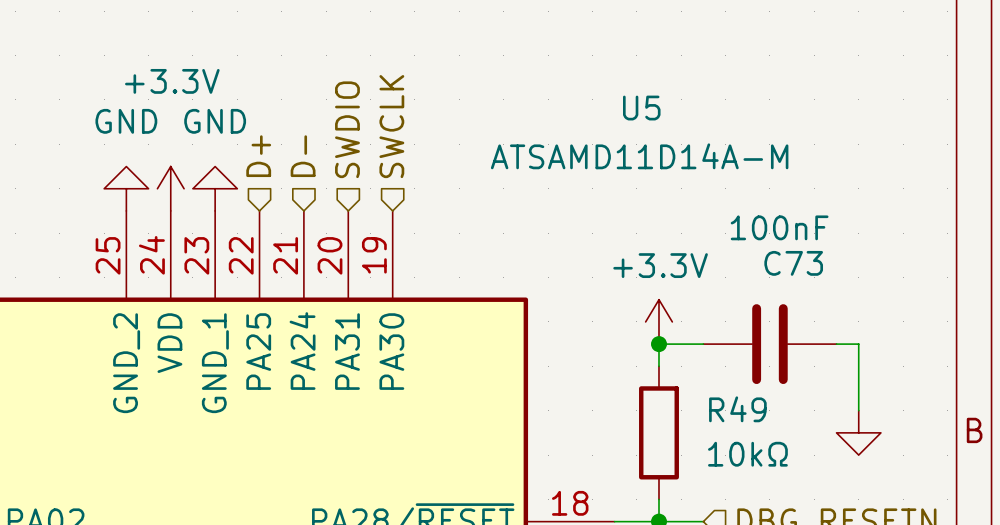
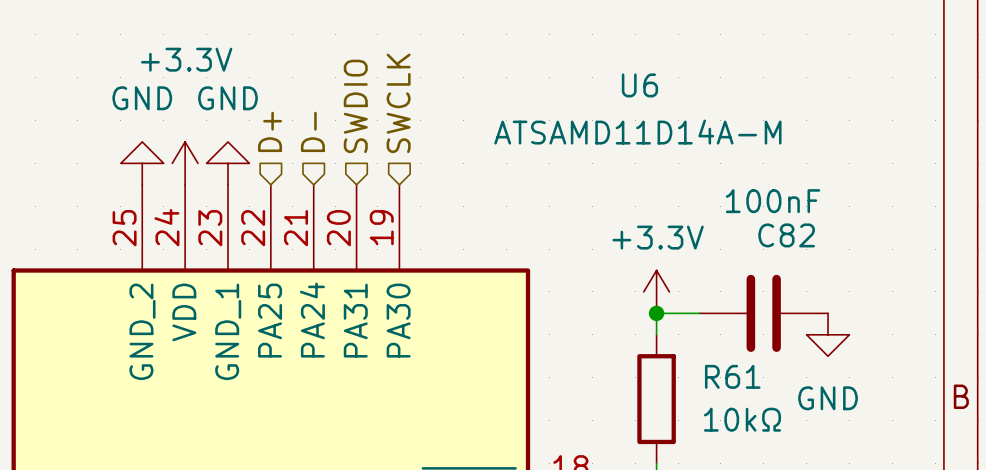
U5 name: U5 (641, 108) -> U6 (639, 85)
C73 name: C73 (793, 263) -> C82 (786, 235)
wire: (836, 344) (858, 344) (858, 410) -> none
power symbol: none -> GND (828, 334)
R49 name: R49 (737, 409) -> R61 (732, 376)
power symbol: (858, 432) -> none

